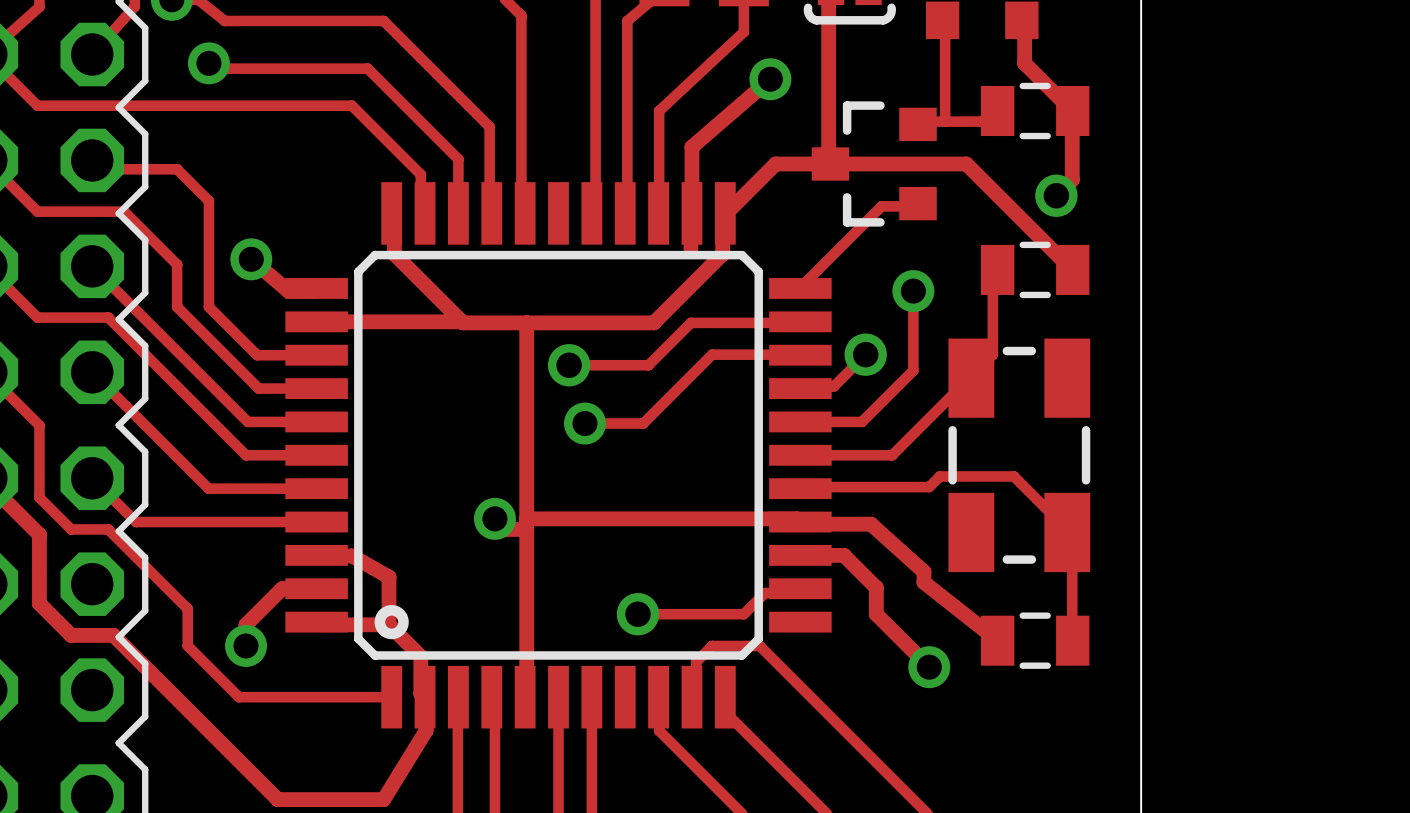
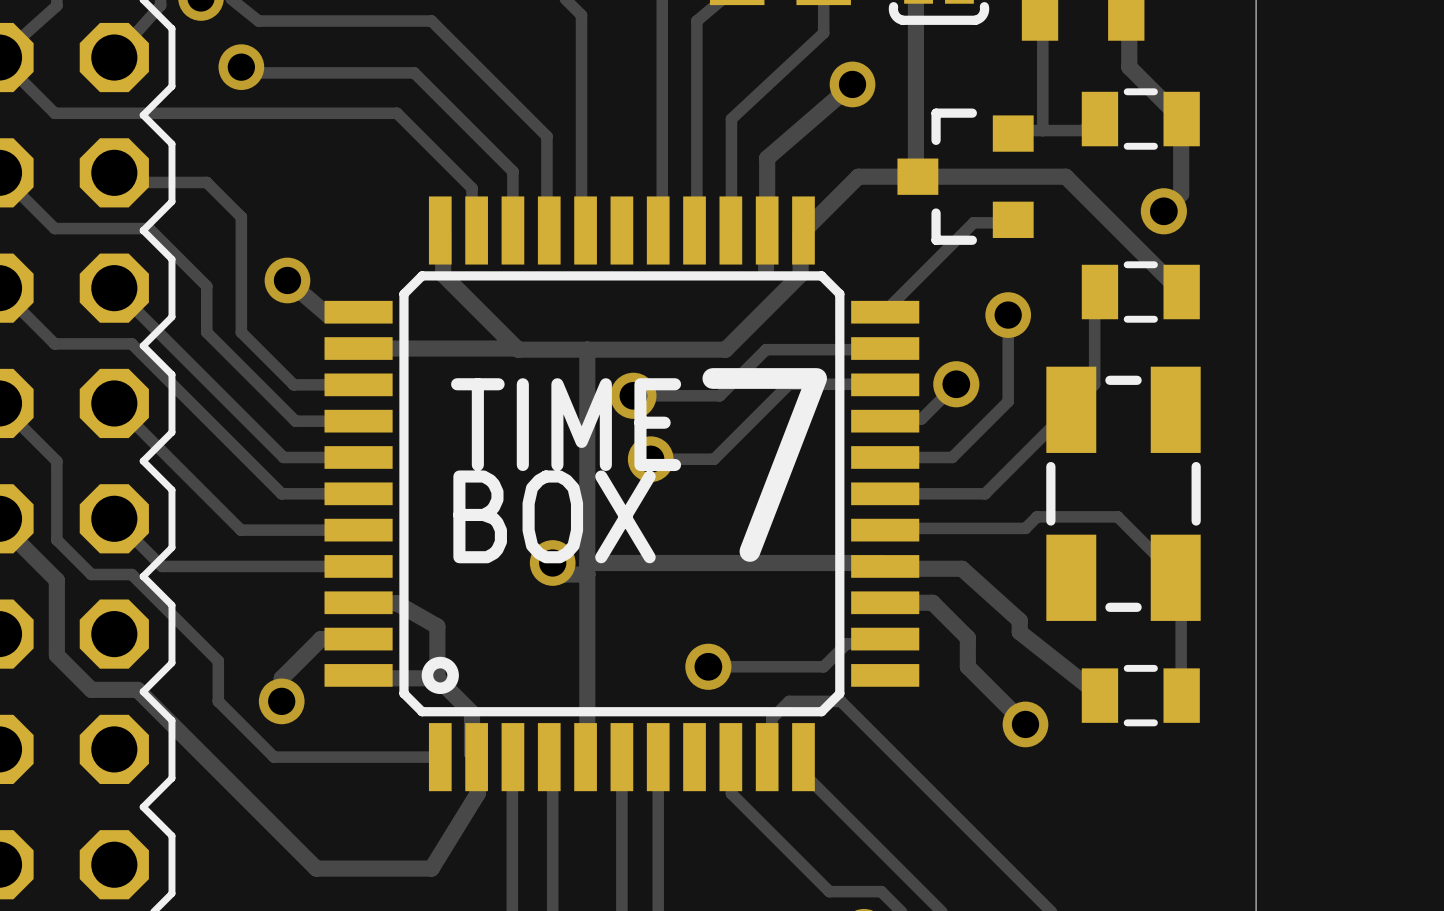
text: none -> TIME (566, 424)
text: none -> 7 (764, 464)
text: none -> BOX (554, 516)

